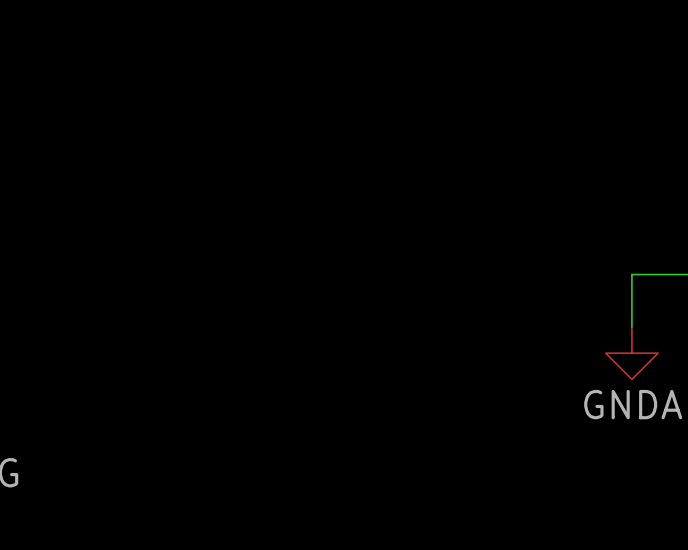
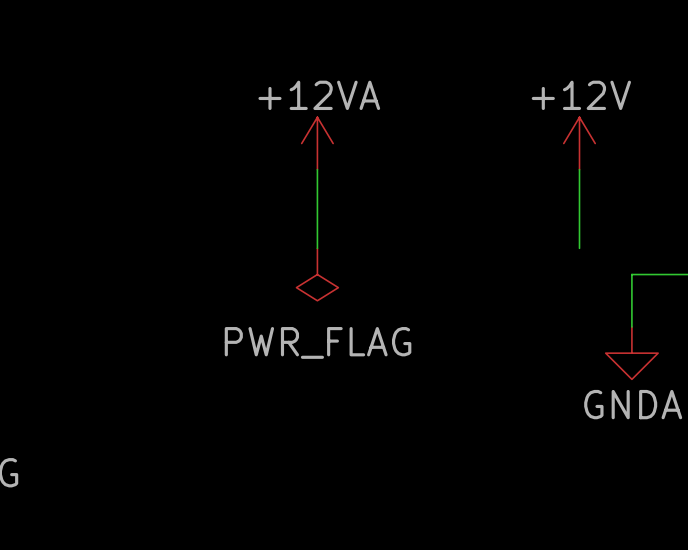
power symbol: none -> +12VA (317, 143)
power symbol: none -> +12V (579, 143)
wire: none -> (317, 169) (317, 248)
wire: none -> (579, 169) (579, 248)
power symbol: none -> PWR_FLAG (317, 274)

